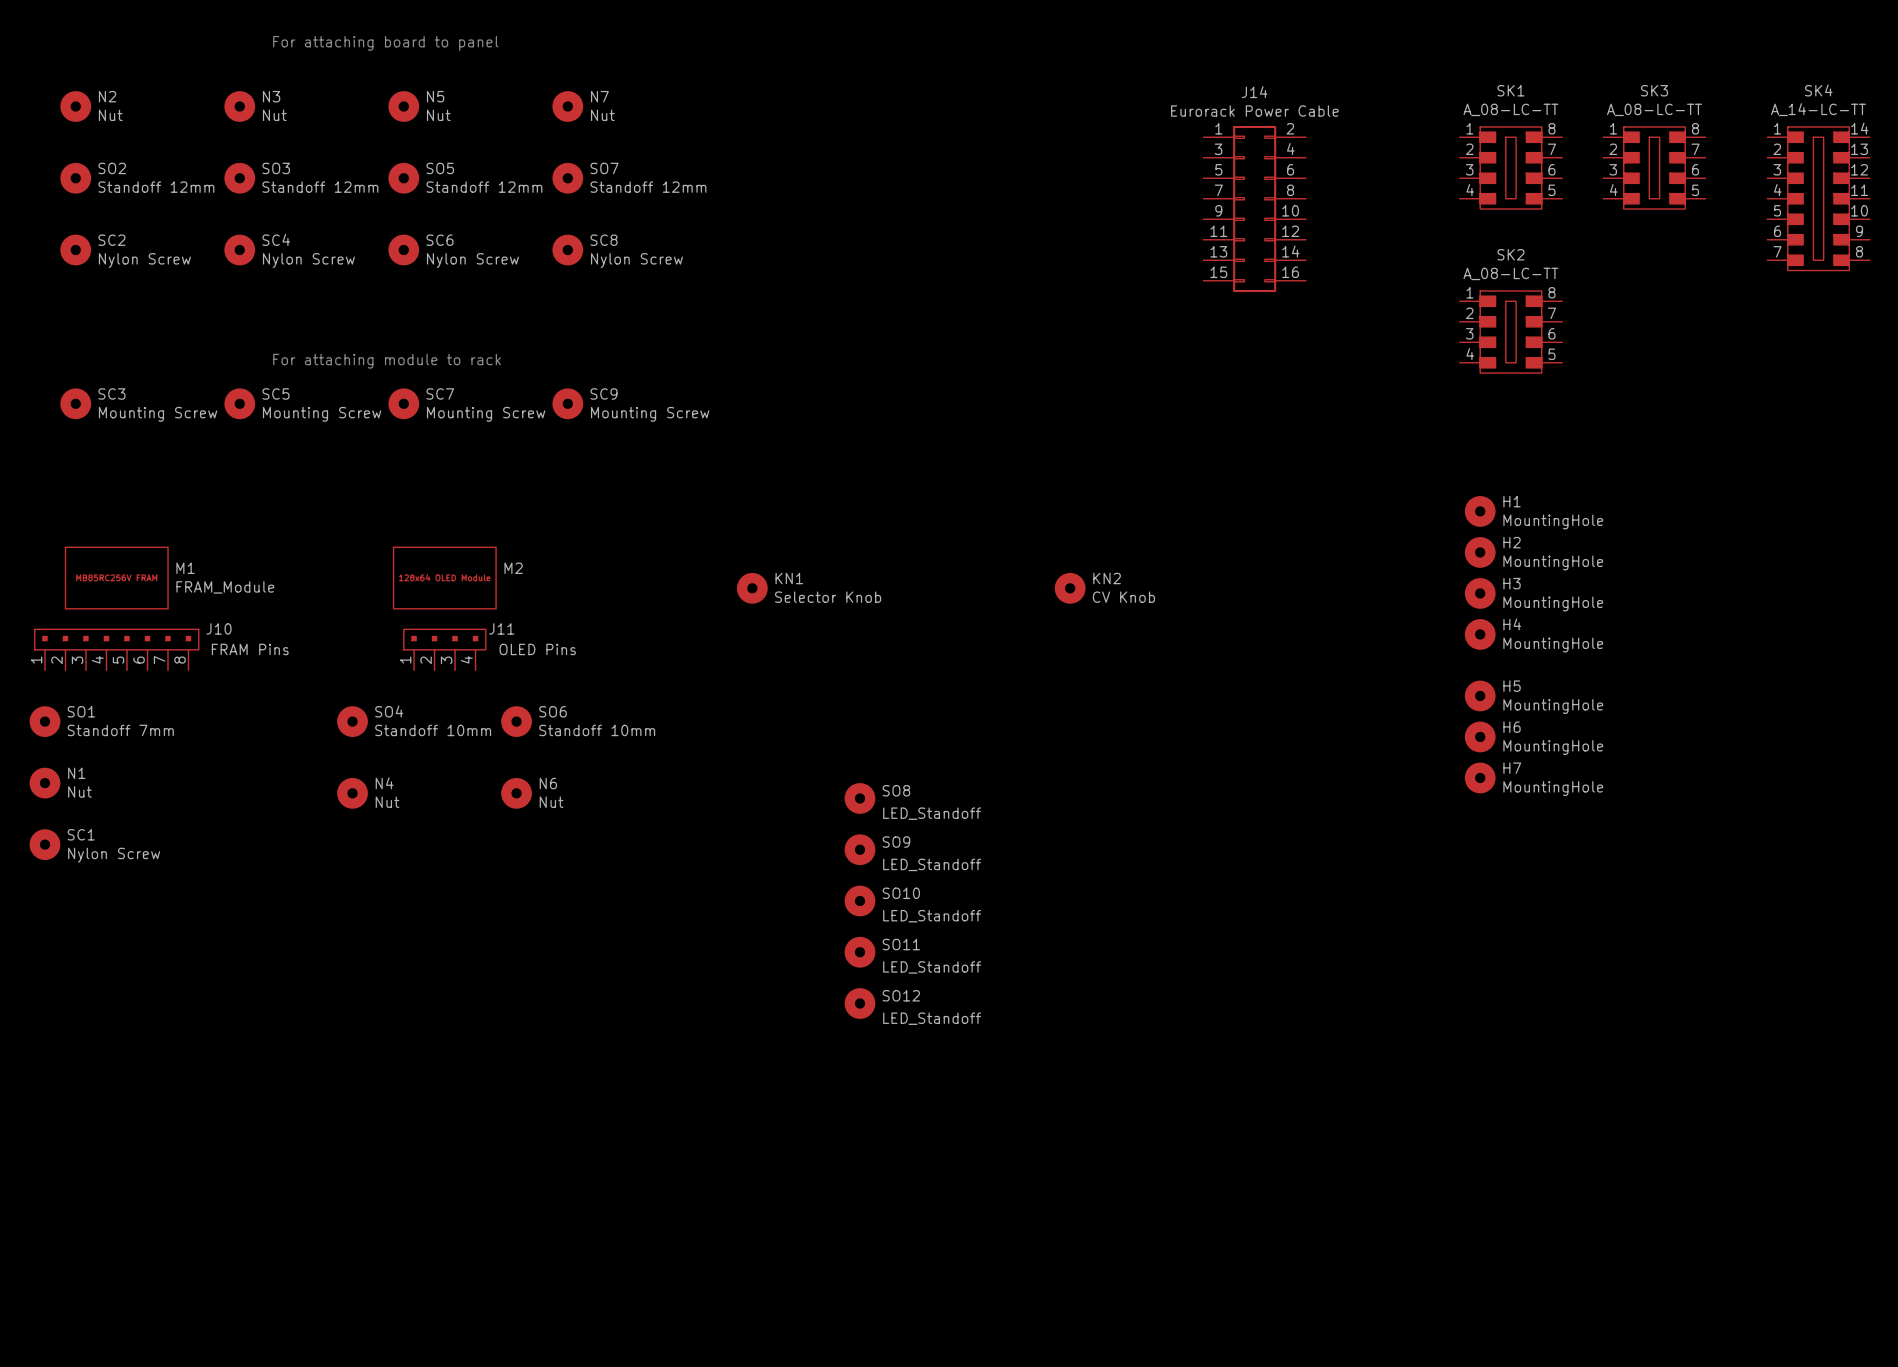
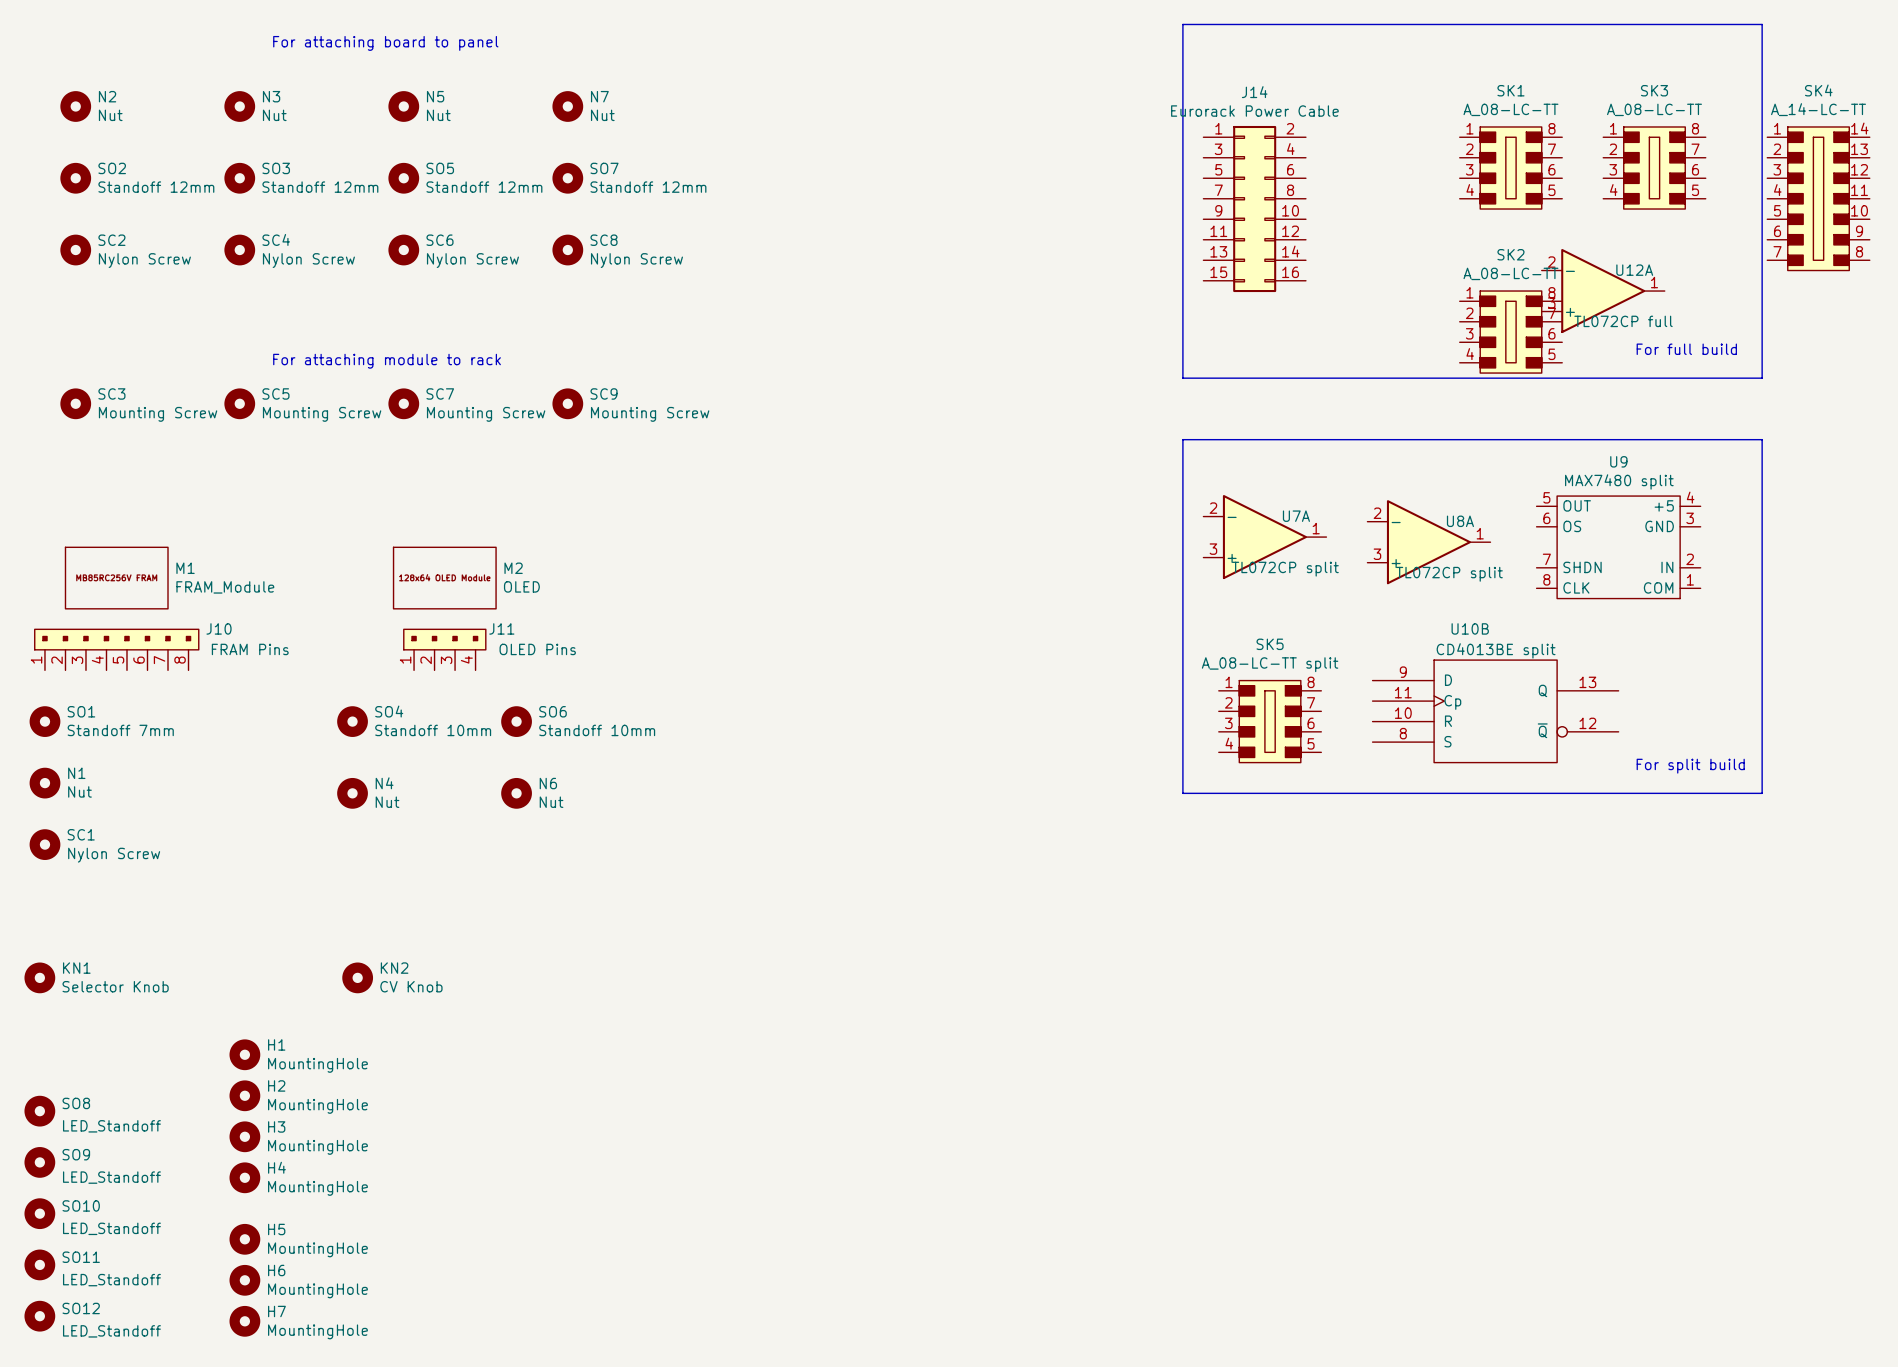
line: none -> (1182, 24) (1762, 24) (1762, 378) (1182, 378) (1182, 24)
U12A: none -> TL072CP full (1603, 291)
text: none -> For full build (1686, 349)
line: none -> (1182, 439) (1762, 439) (1762, 793) (1182, 793) (1182, 439)
H1 position: (1480, 511) -> (244, 1054)
U7A: none -> TL072CP split (1264, 537)
U8A: none -> TL072CP split (1428, 542)
U9: none -> MAX7480 split (1618, 547)
H2 position: (1480, 552) -> (244, 1095)
M2 value: none -> OLED (521, 586)
KN1 position: (752, 588) -> (39, 977)
KN2 position: (1070, 588) -> (357, 977)
H3 position: (1480, 593) -> (244, 1136)
H4 position: (1480, 634) -> (244, 1177)
H5 position: (1480, 695) -> (244, 1239)
U10B: none -> CD4013BE split (1495, 711)
SK5: none -> A_08-LC-TT split (1270, 721)
H6 position: (1480, 736) -> (244, 1280)
text: none -> For split build (1690, 766)
H7 position: (1480, 777) -> (244, 1321)
SO8 position: (859, 798) -> (39, 1111)
SO9 position: (859, 849) -> (39, 1162)
SO10 position: (859, 900) -> (39, 1213)
SO11 position: (859, 952) -> (39, 1264)
SO12 position: (859, 1003) -> (39, 1316)

